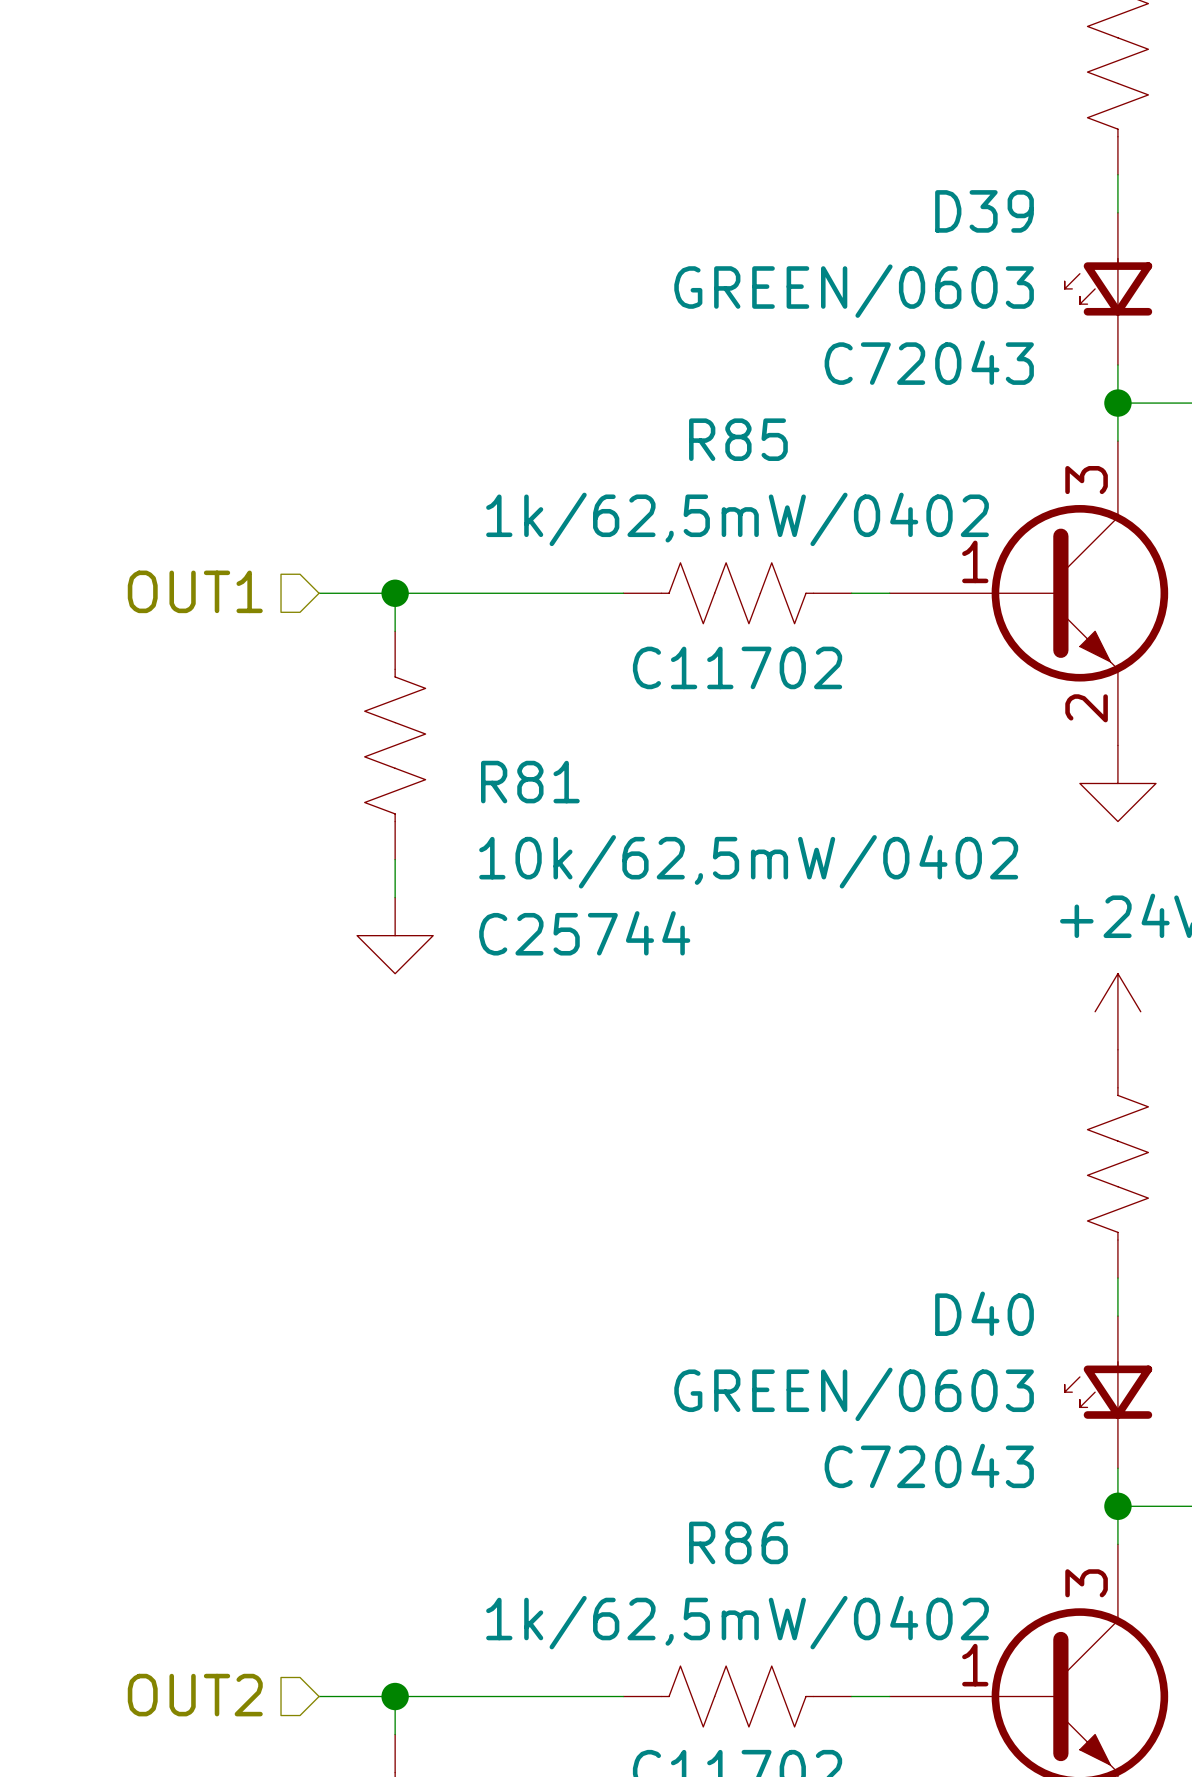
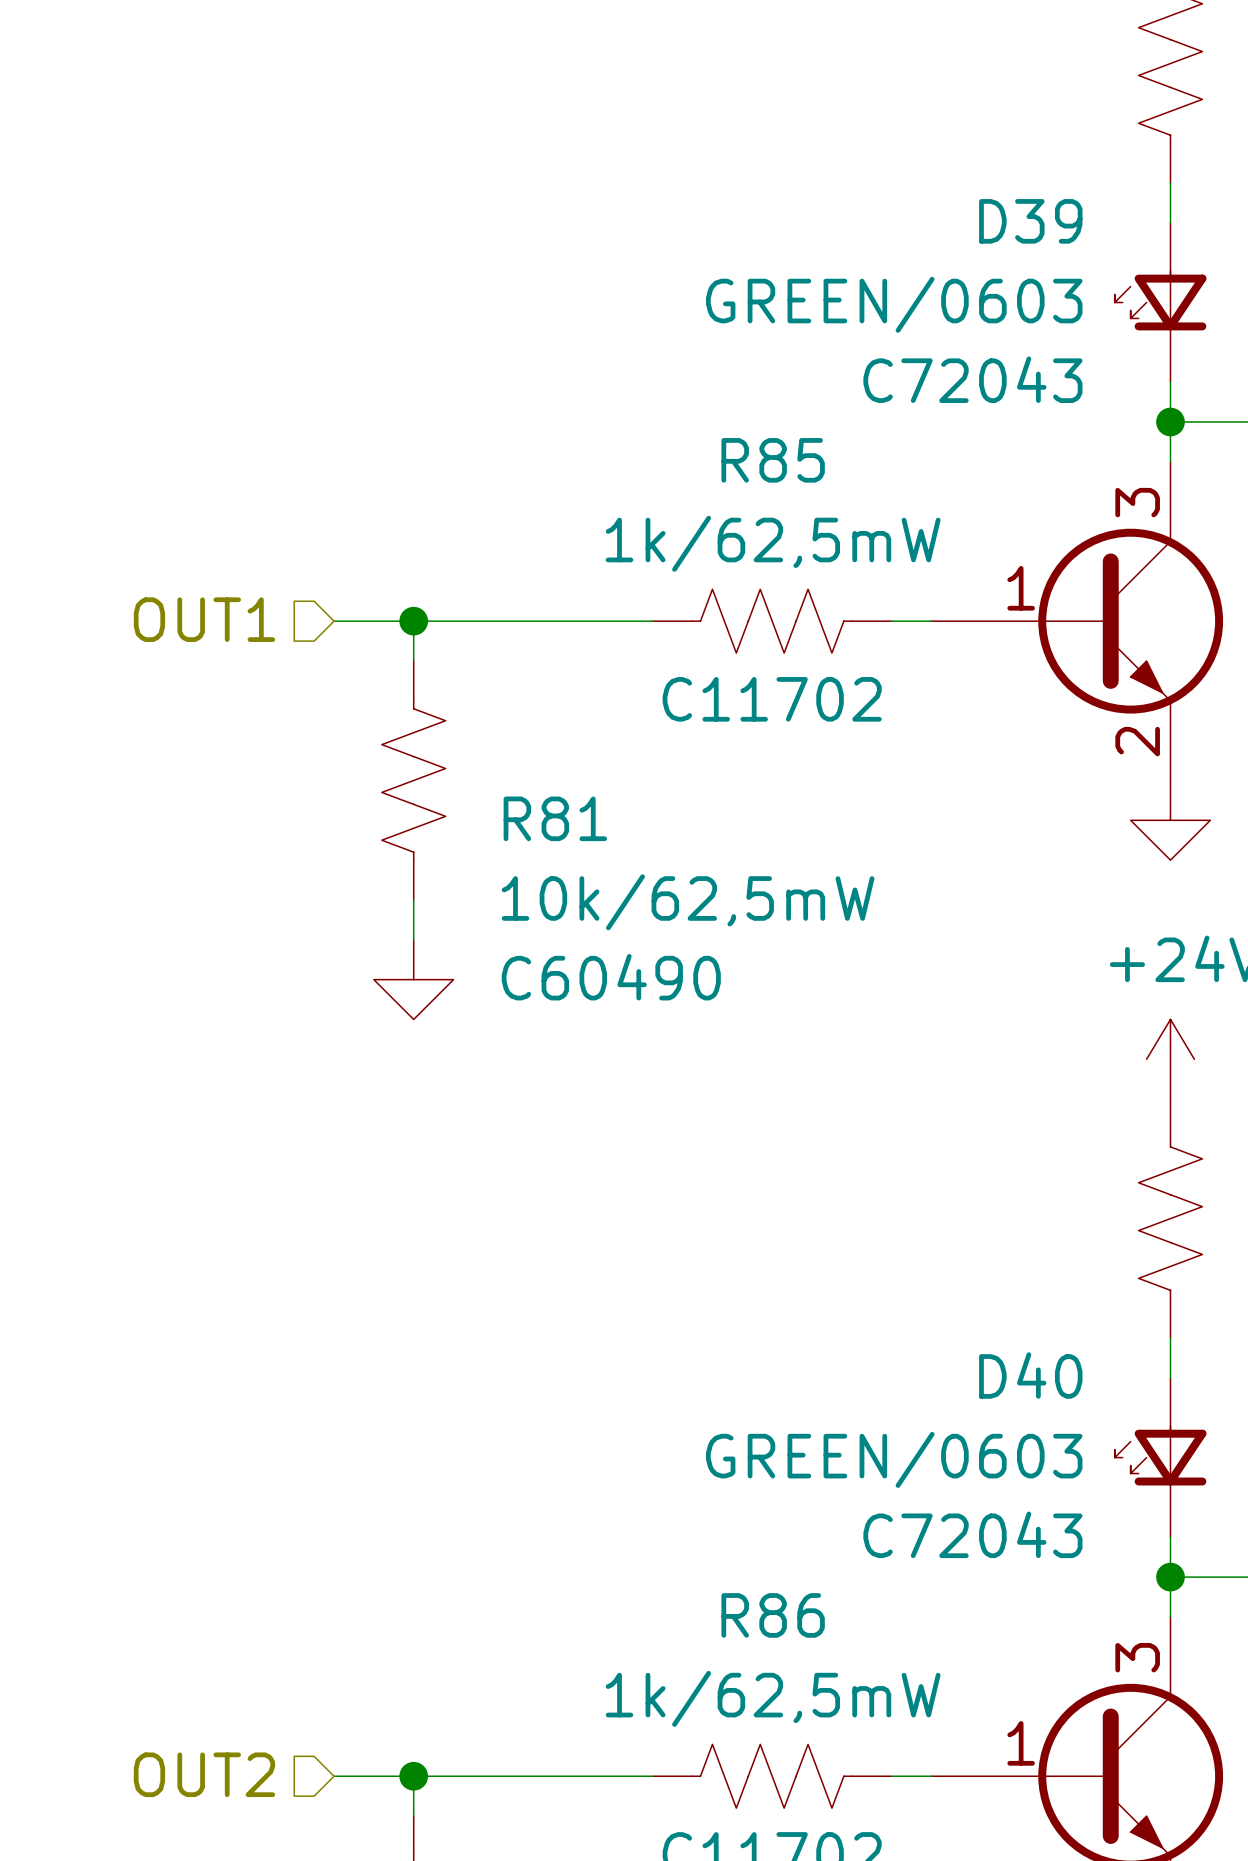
R85 value: 1k/62,5mW/0402 (737, 519) -> 1k/62,5mW (773, 543)
R81 value: 10k/62,5mW/0402 (748, 861) -> 10k/62,5mW (688, 902)
R81 text: C25744 (584, 933) -> C60490 (611, 977)
R86 value: 1k/62,5mW/0402 (737, 1622) -> 1k/62,5mW (773, 1698)

